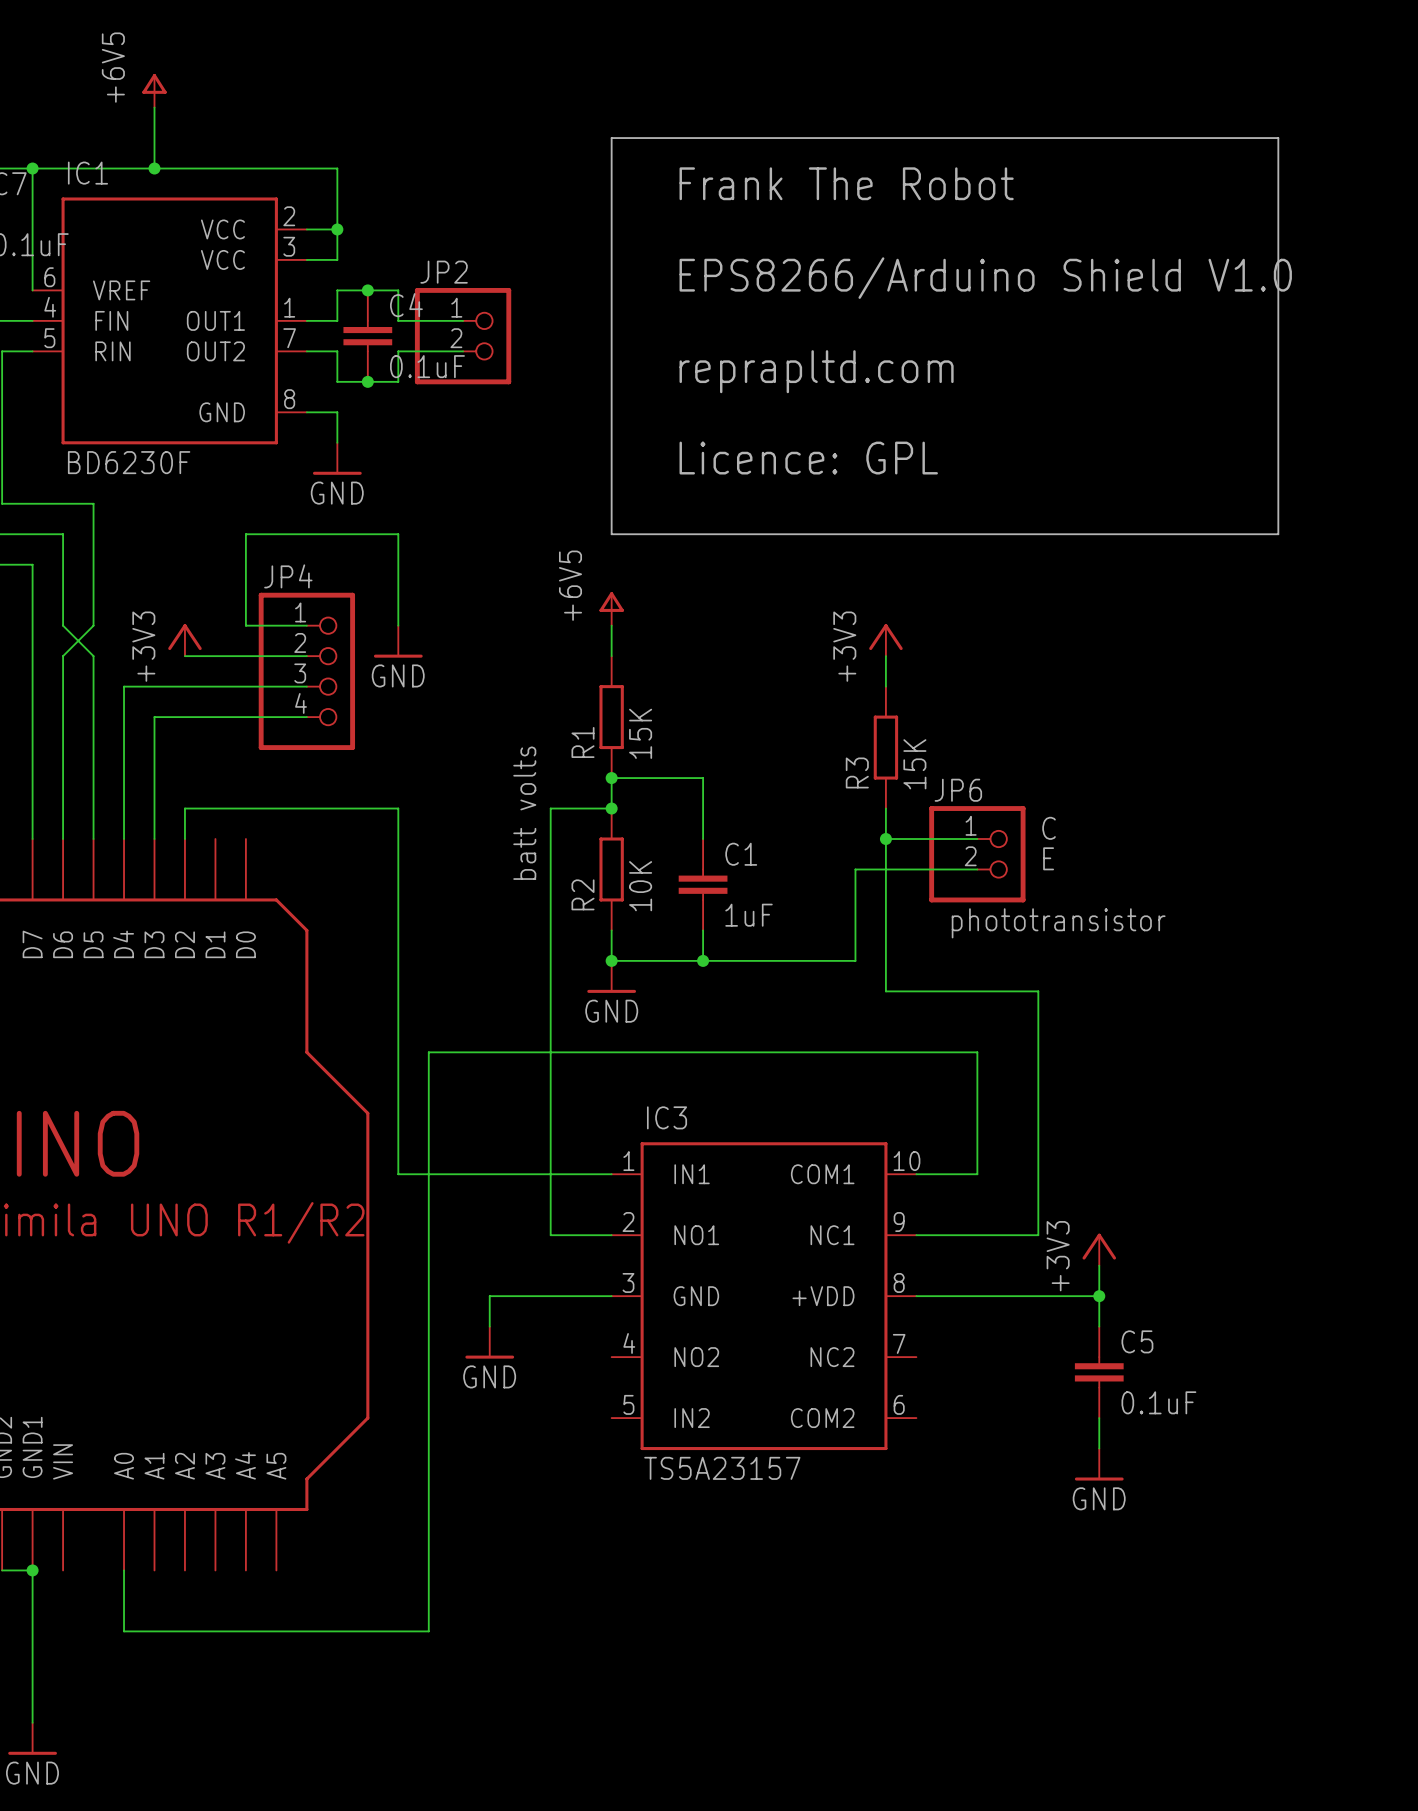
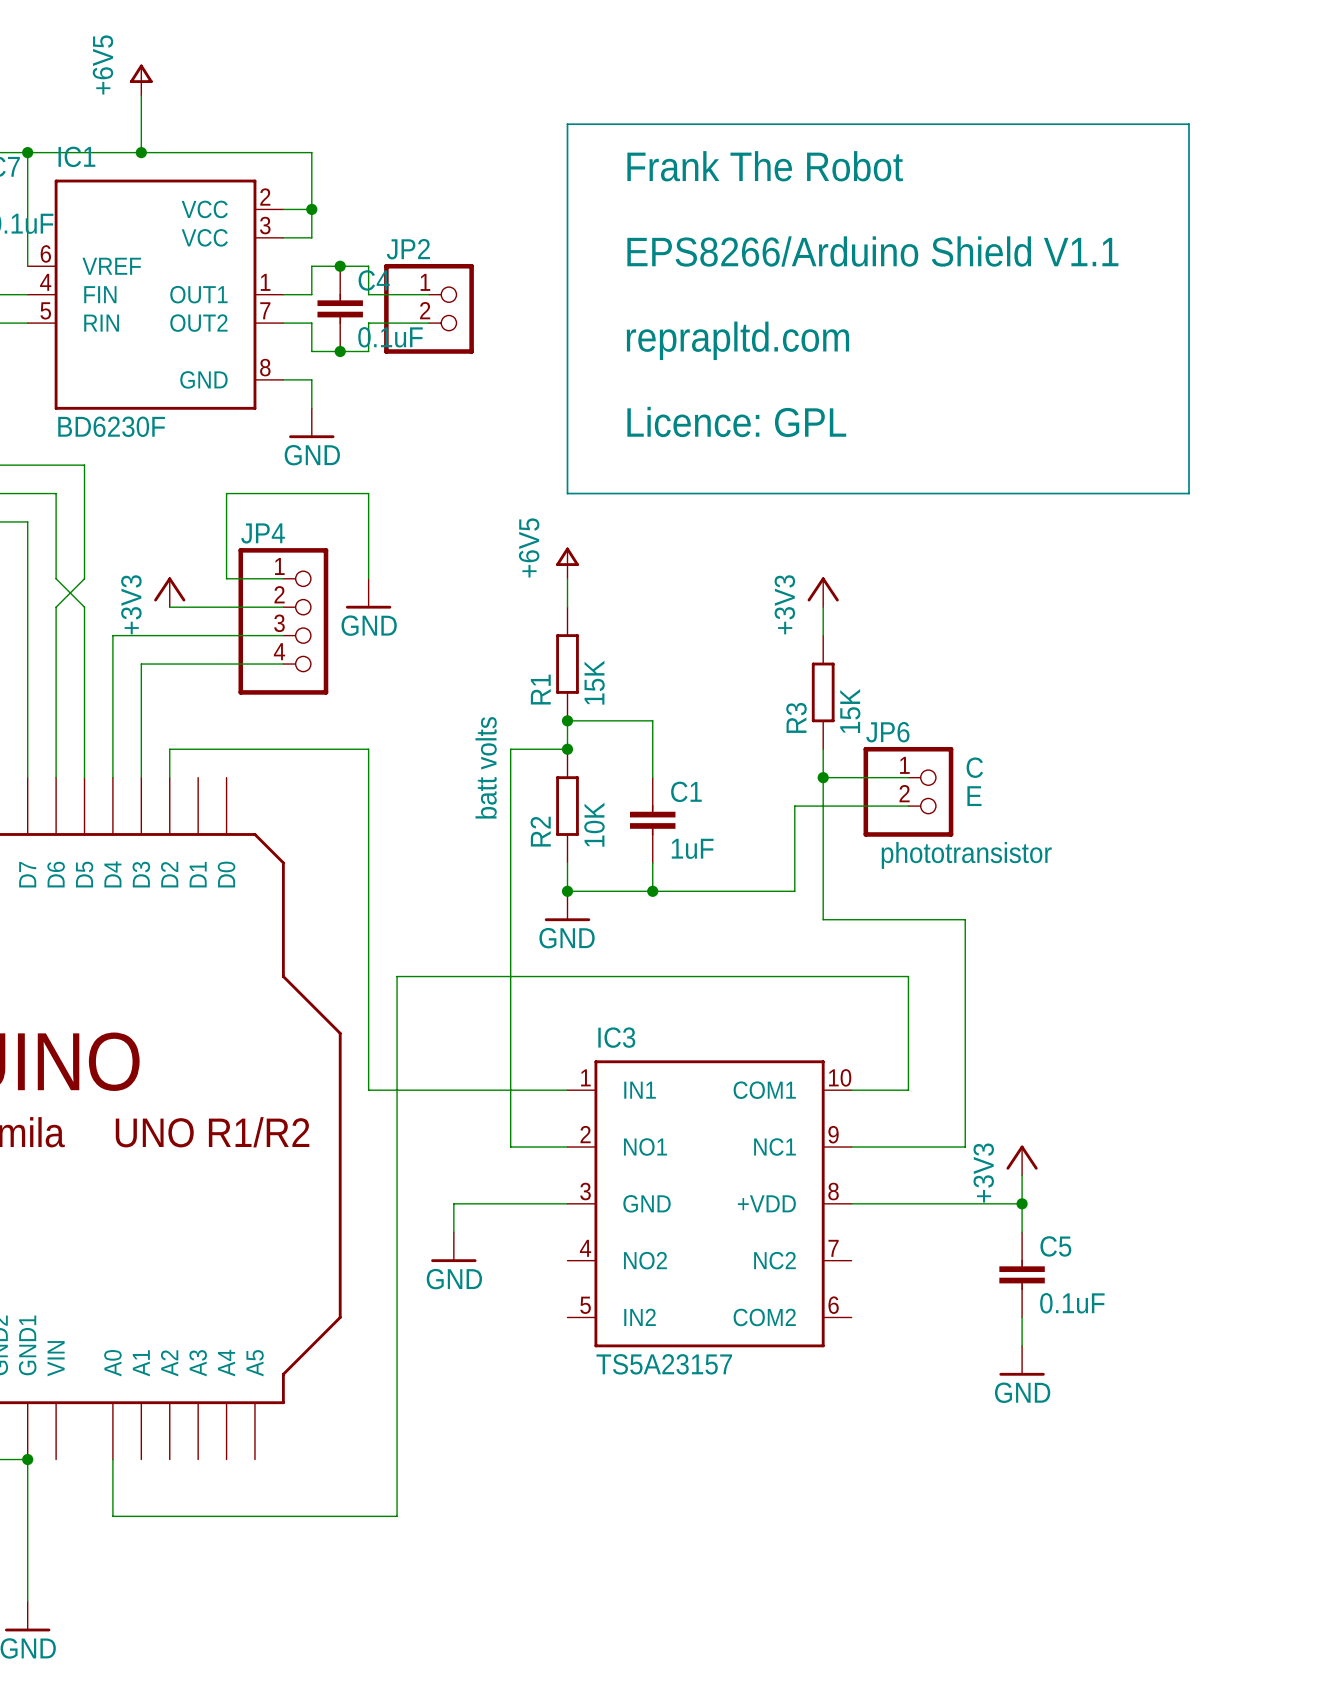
text: EPS8266/Arduino Shield V1.0 (985, 278) -> EPS8266/Arduino Shield V1.1 (872, 251)

